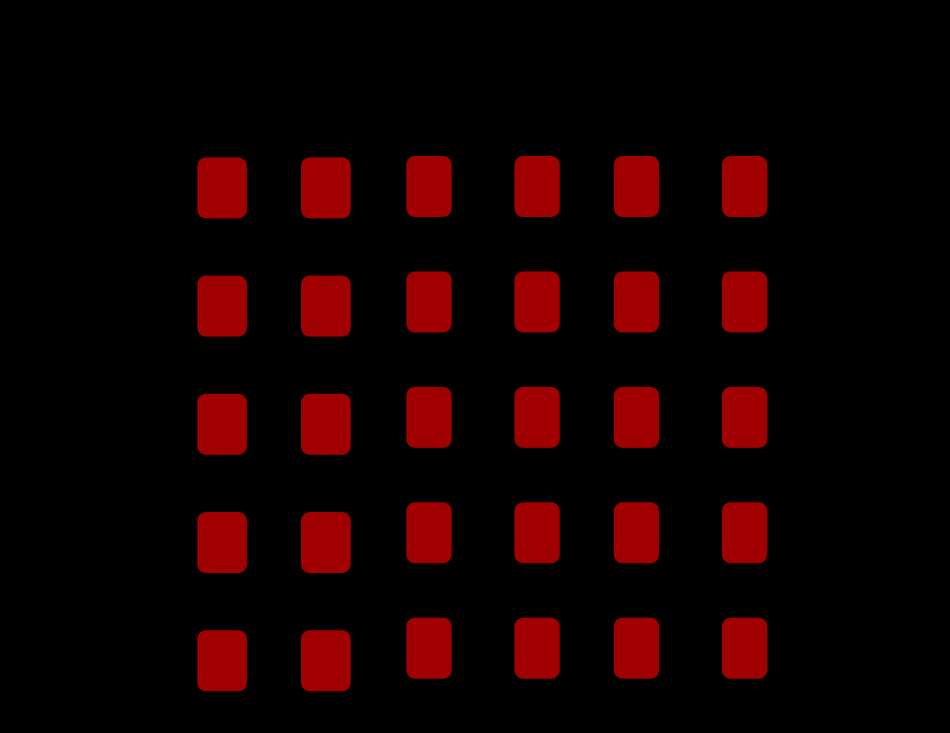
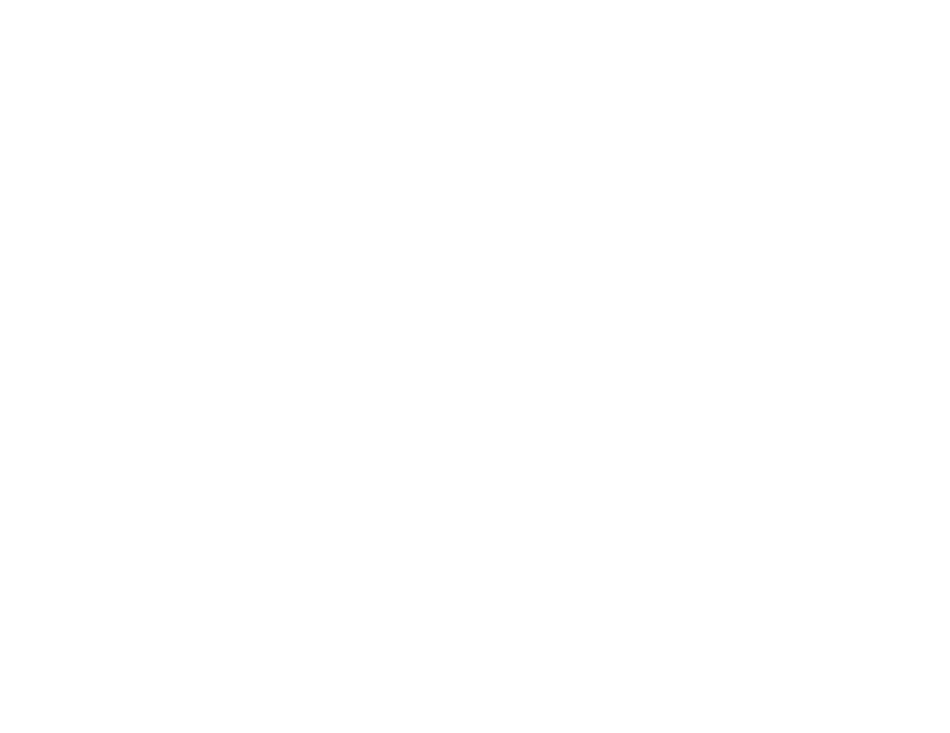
part: (483, 186) -> none
part: (690, 186) -> none
part: (273, 187) -> none
part: (483, 301) -> none
part: (690, 301) -> none
part: (273, 306) -> none
part: (483, 417) -> none
part: (690, 417) -> none
part: (273, 424) -> none
part: (483, 532) -> none
part: (690, 532) -> none
part: (273, 542) -> none
part: (483, 648) -> none
part: (690, 648) -> none
part: (273, 660) -> none

